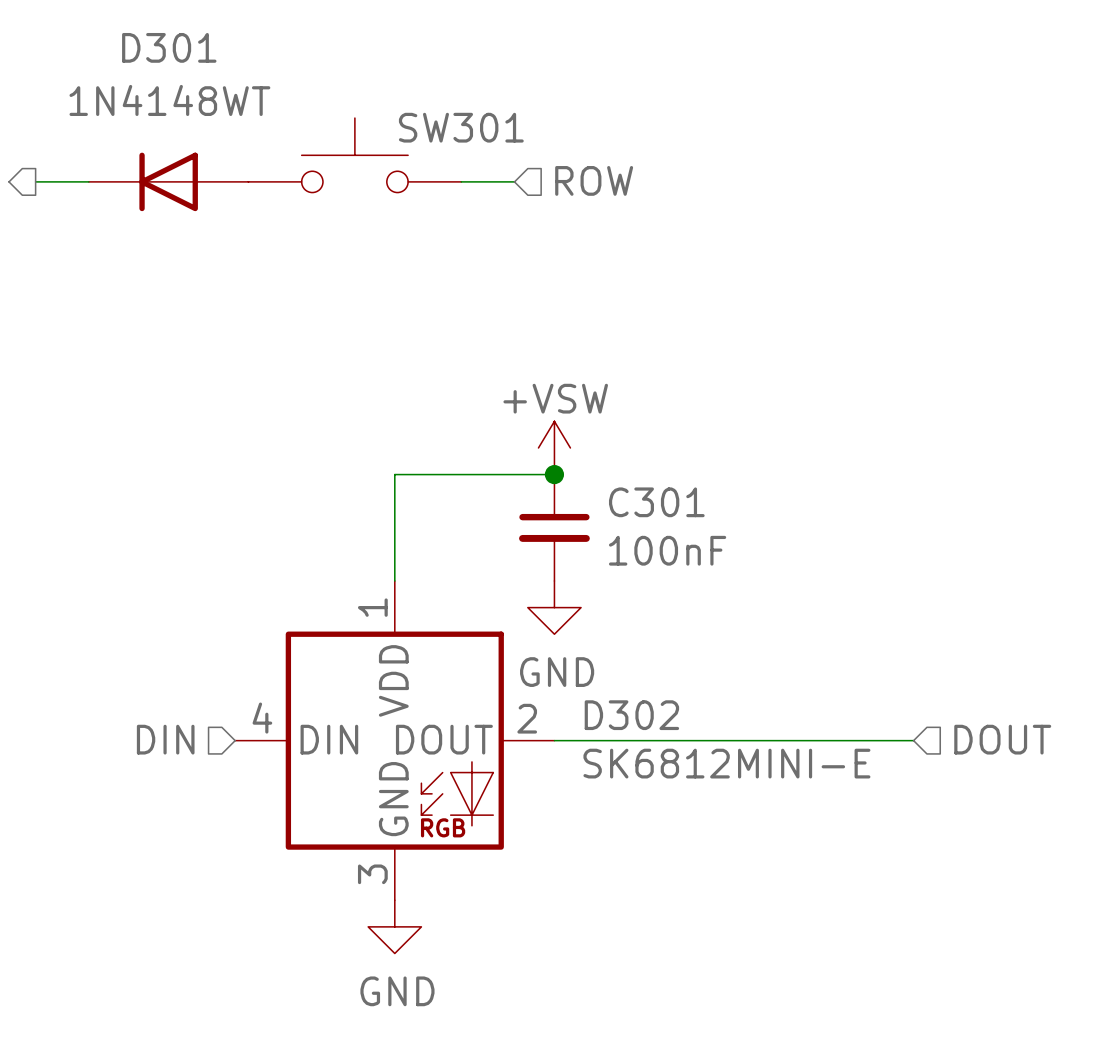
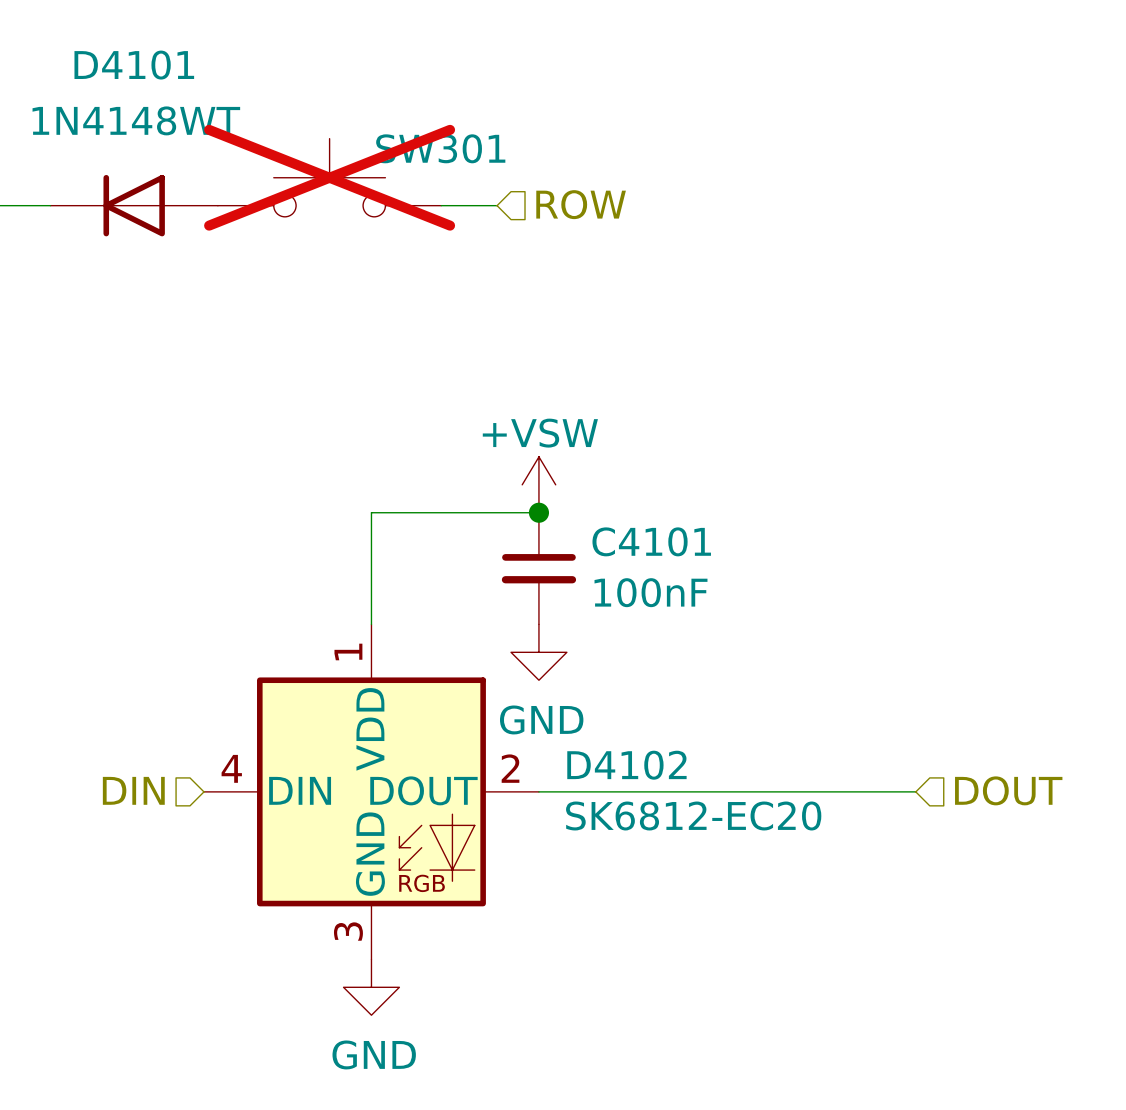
D301 name: D301 (169, 47) -> D4101 (134, 65)
SW301 do-not-place cross: none -> (329, 177)
C301 name: C301 (656, 502) -> C4101 (651, 541)
D302 name: D302 (631, 715) -> D4102 (626, 765)
D302 value: SK6812MINI-E (726, 763) -> SK6812-EC20 (693, 815)

